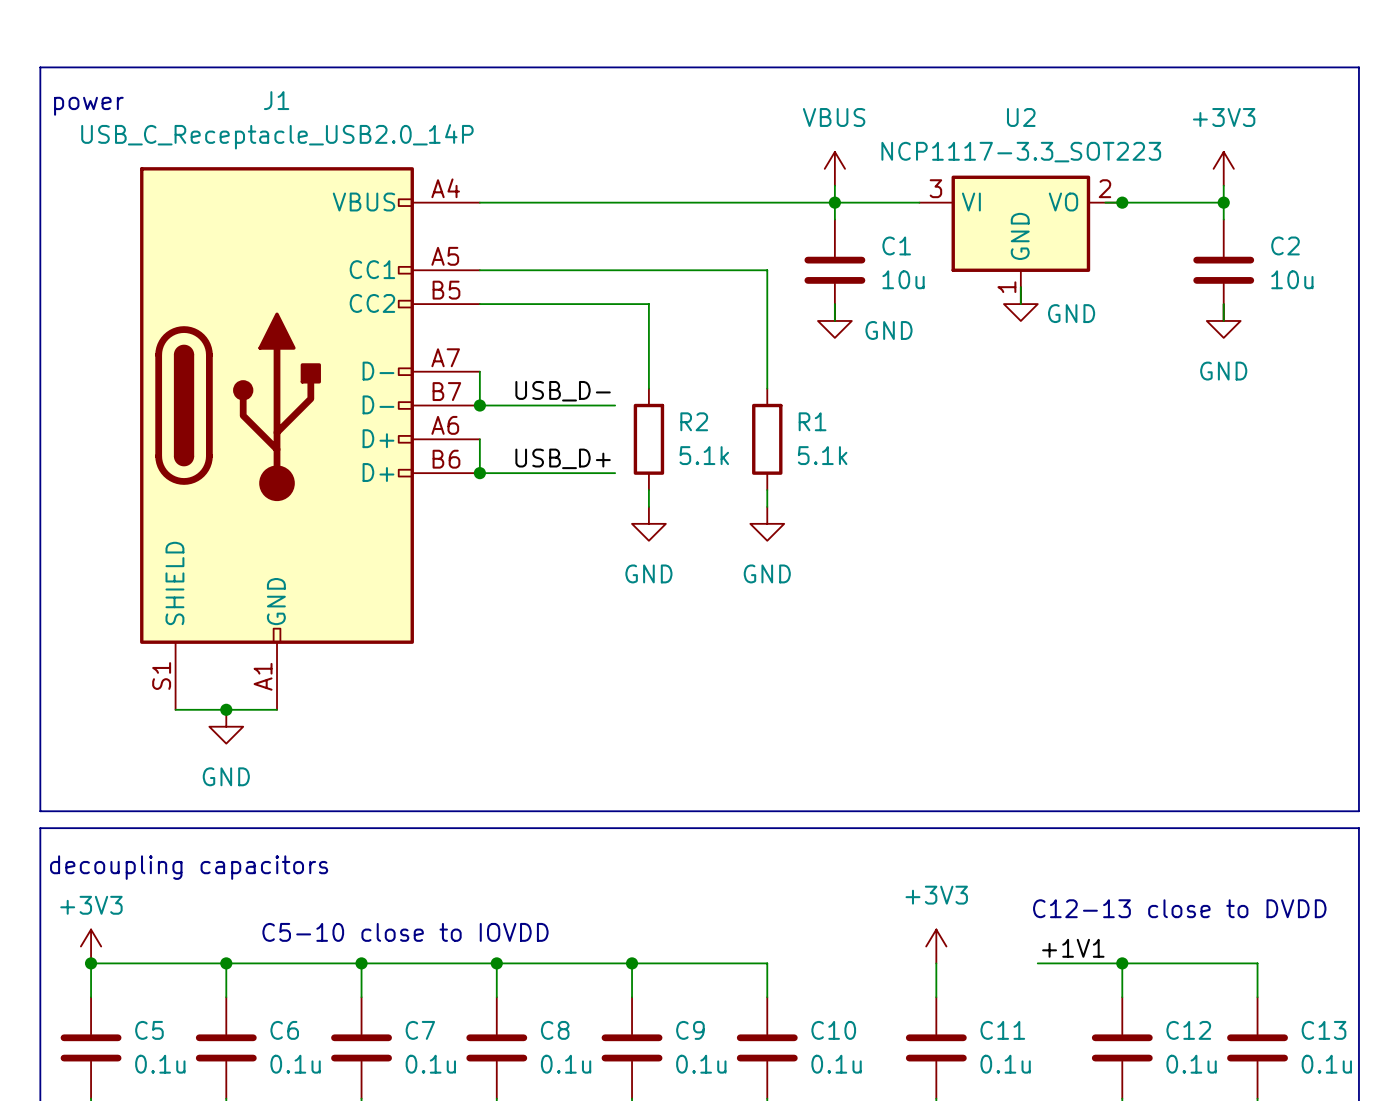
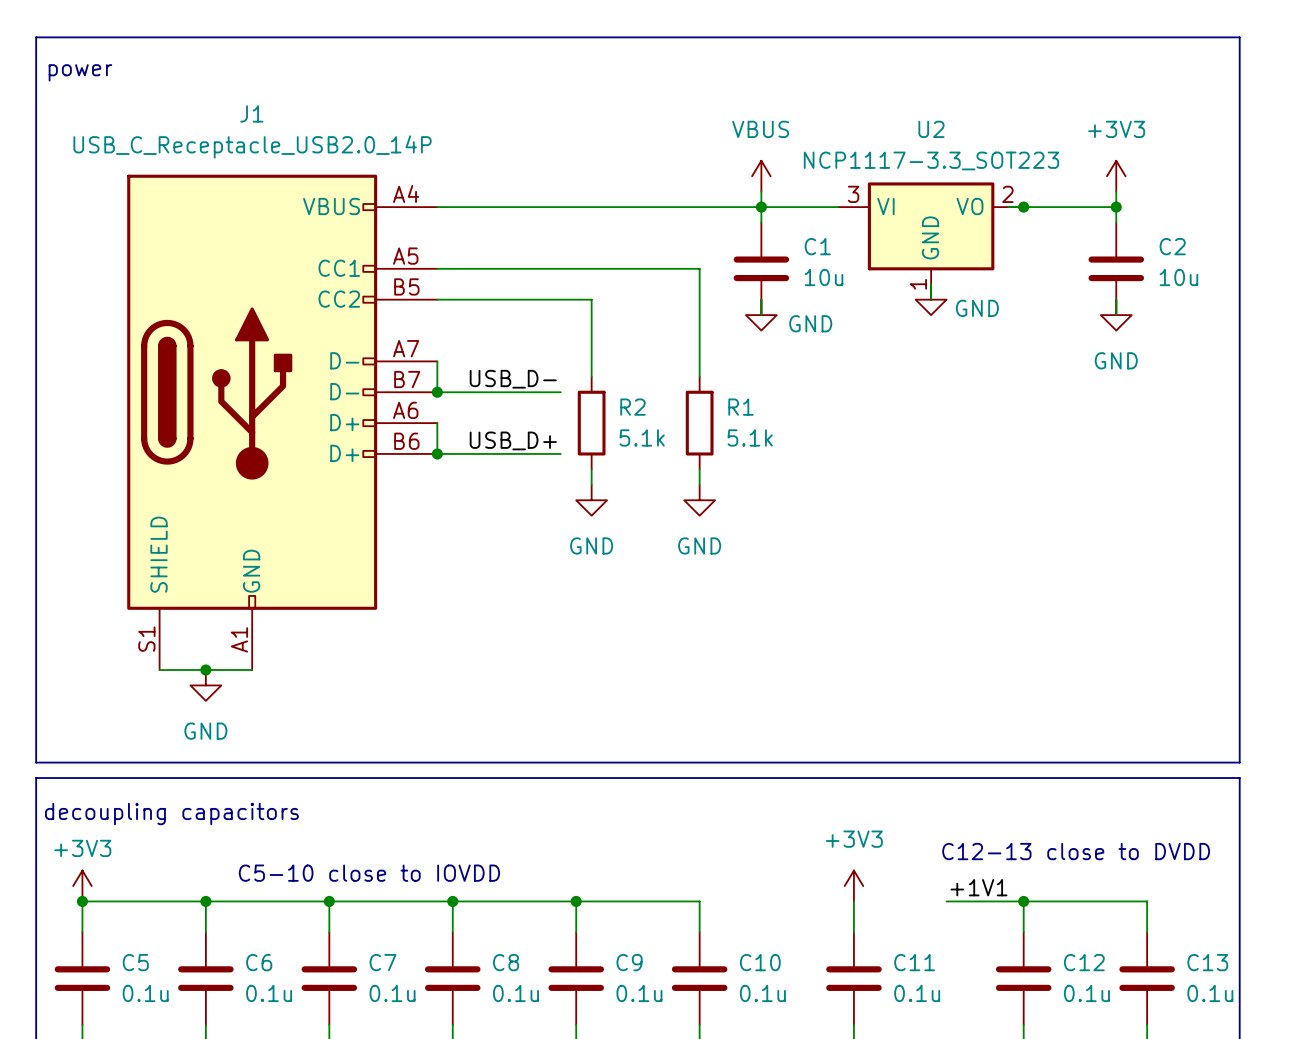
line: (40, 67) (1358, 67) -> (36, 83) (36, 37) (1239, 37) (1239, 83)
text position: power (88, 106) -> power (80, 72)

